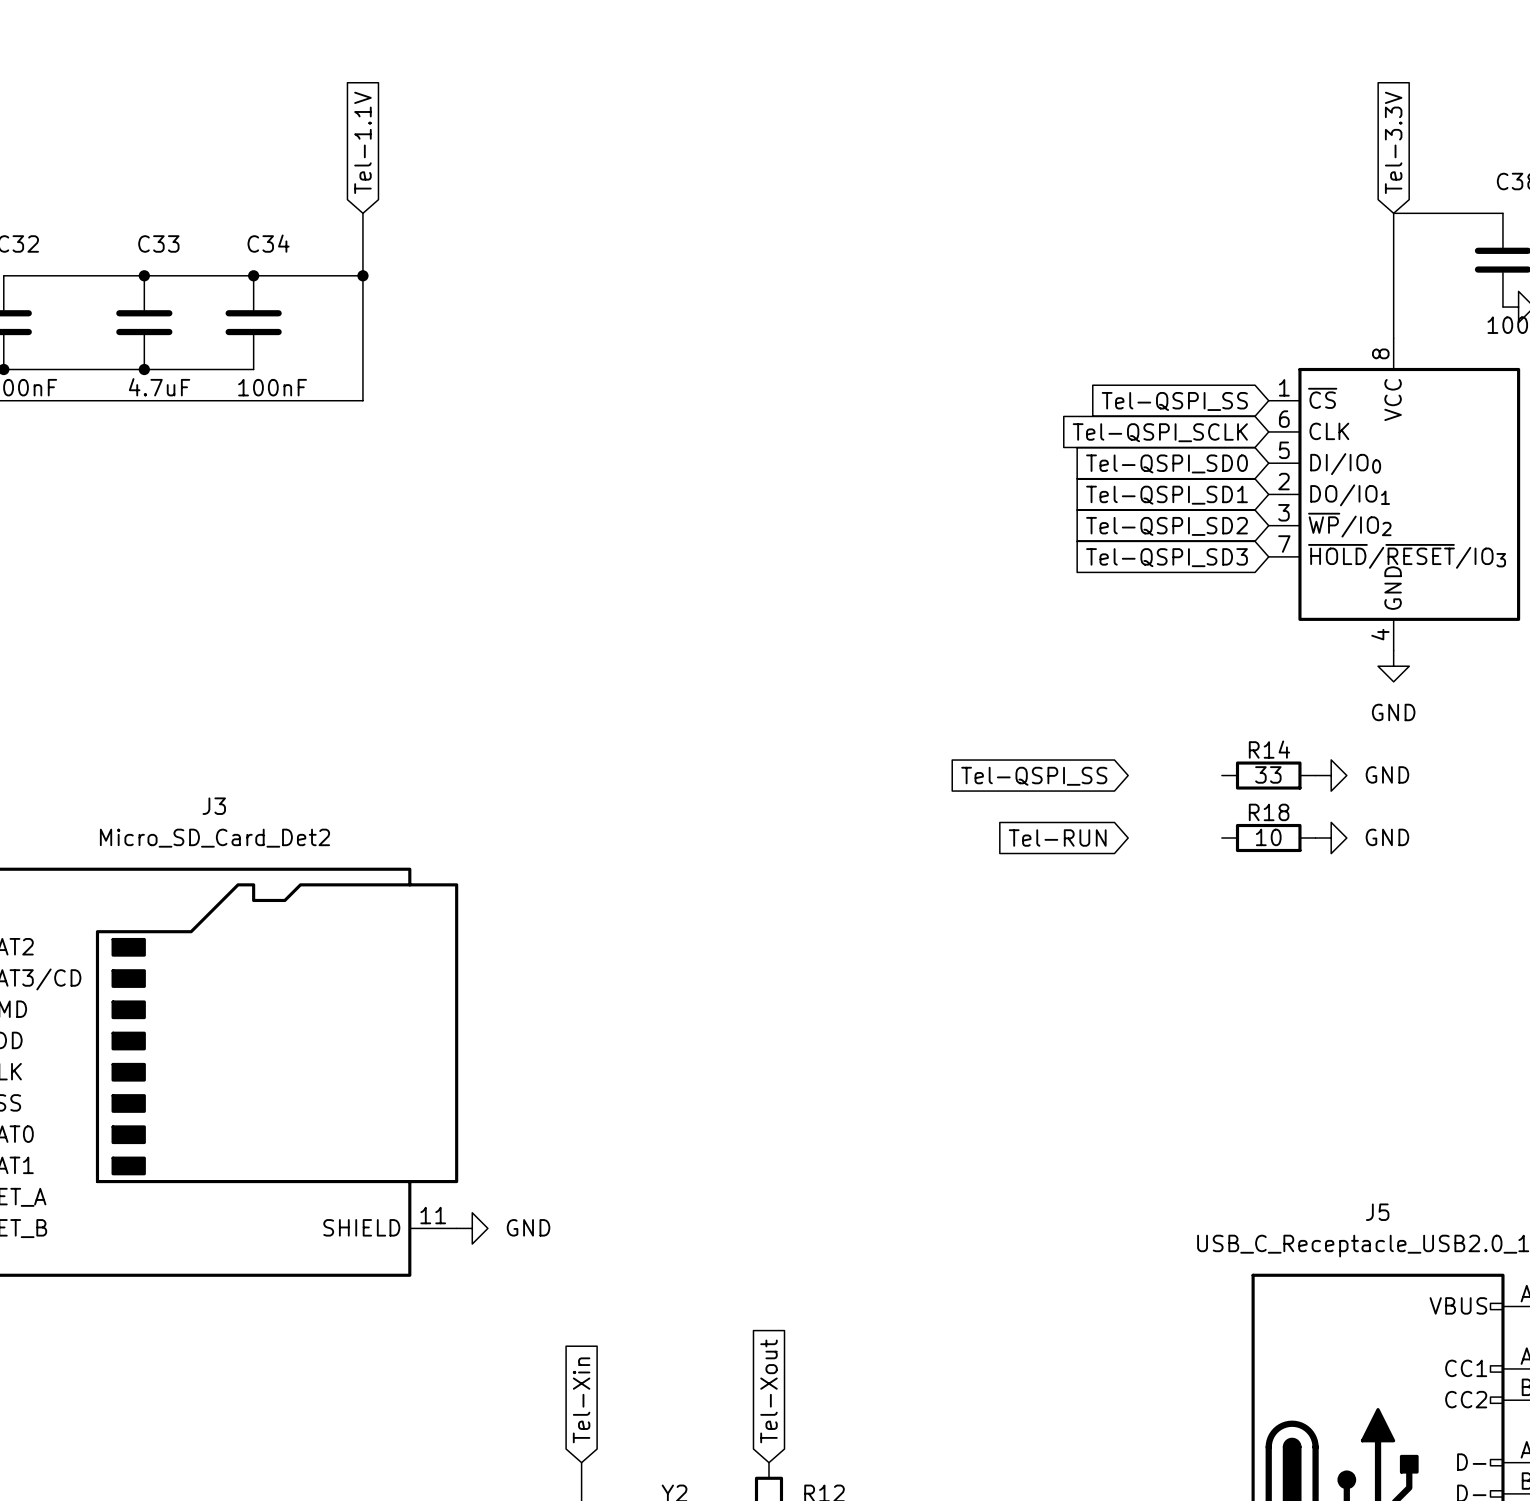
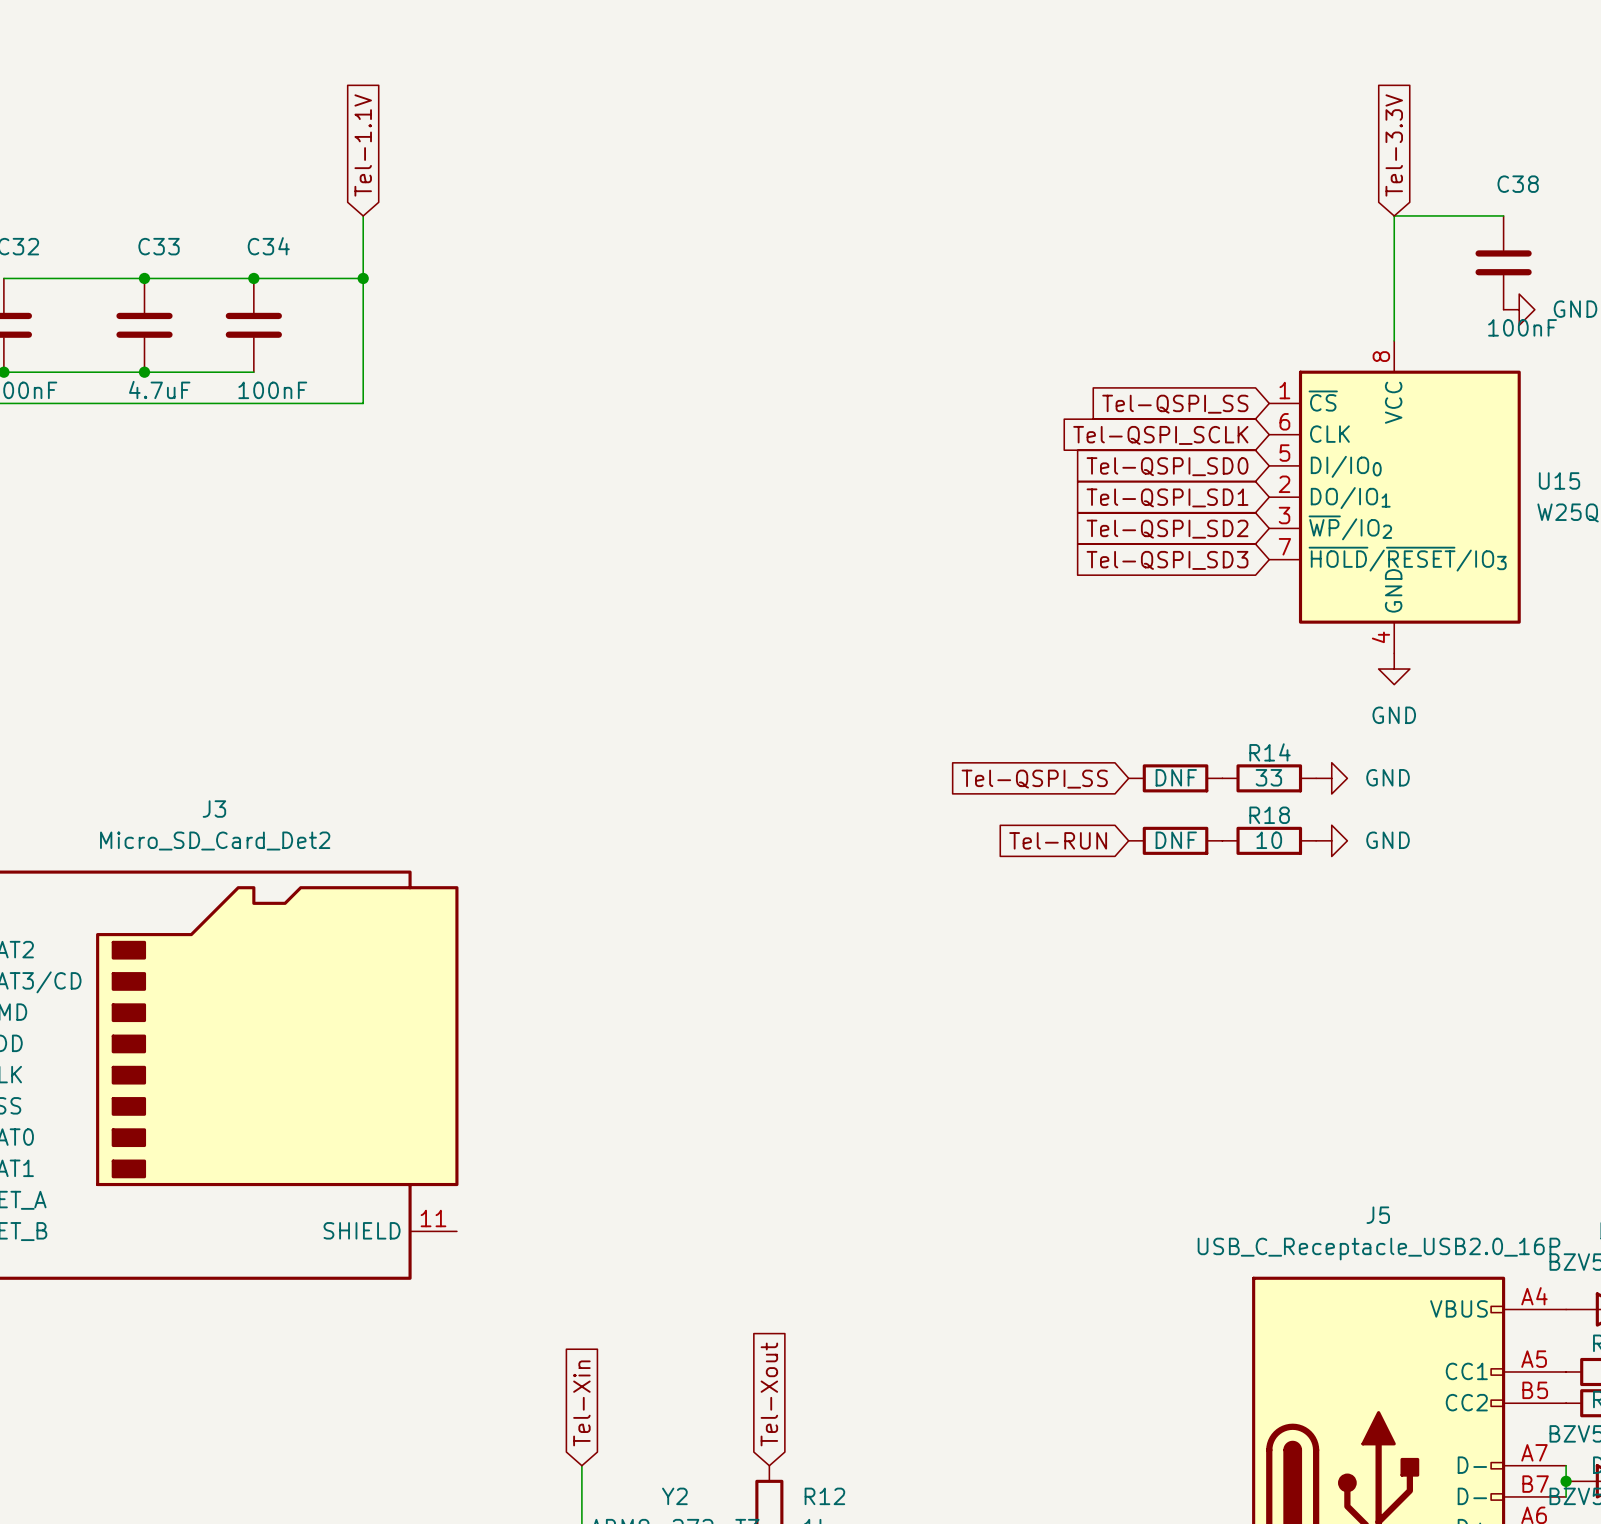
part: none -> DNF (1175, 778)
part: none -> DNF (1175, 840)
power symbol: GND (472, 1228) -> none

